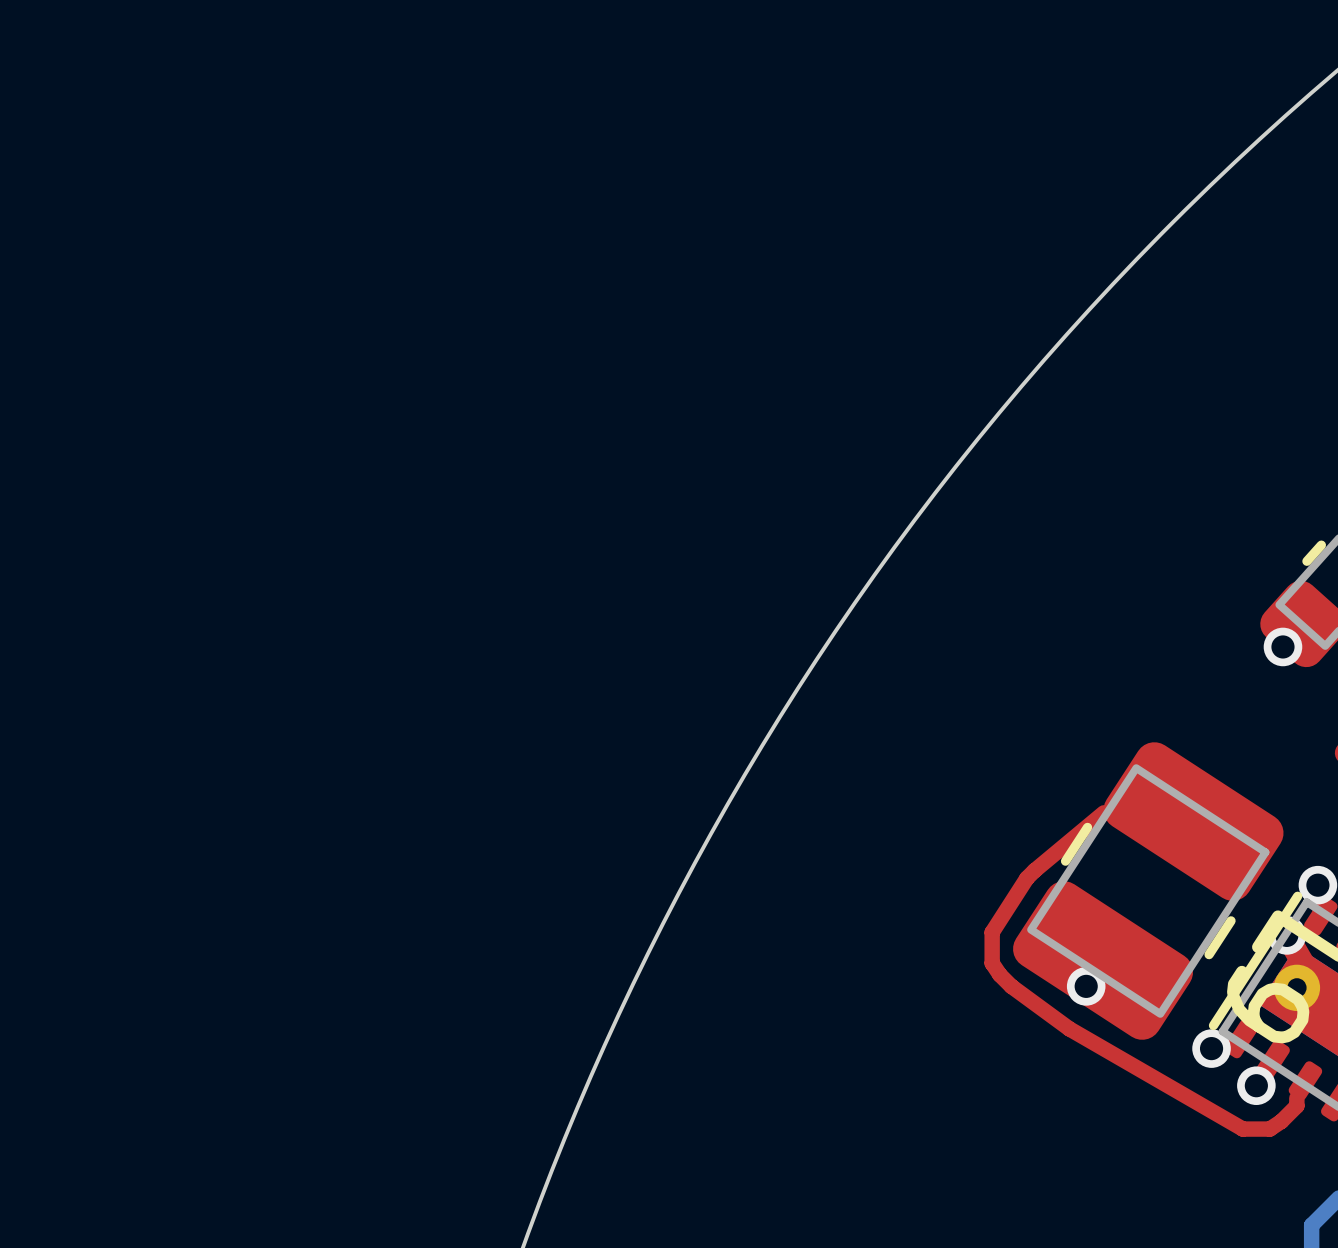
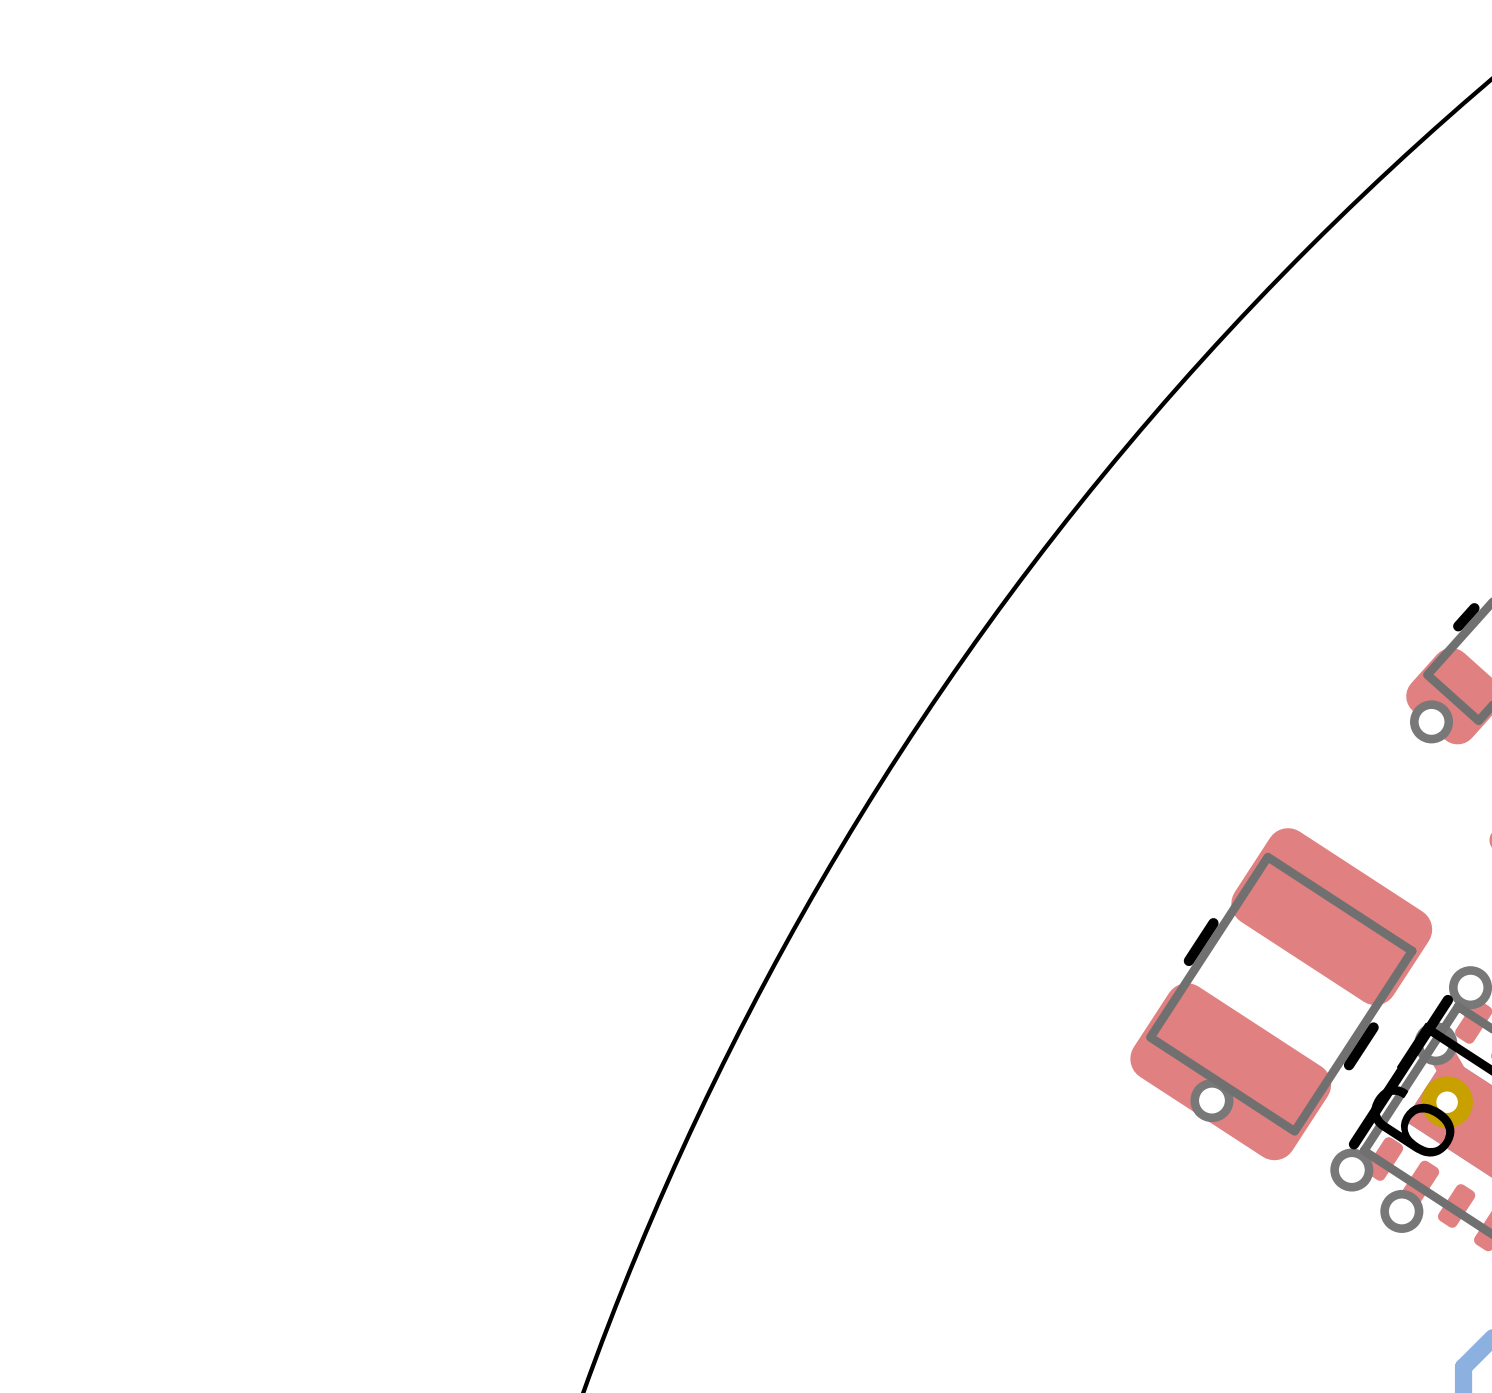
top track: (1104, 812) (1026, 878) (992, 932) (992, 963) (999, 974) (1011, 986) (1069, 1028) (1242, 1129) (1269, 1129) (1281, 1121) (1296, 1105) (1296, 1098) -> none

